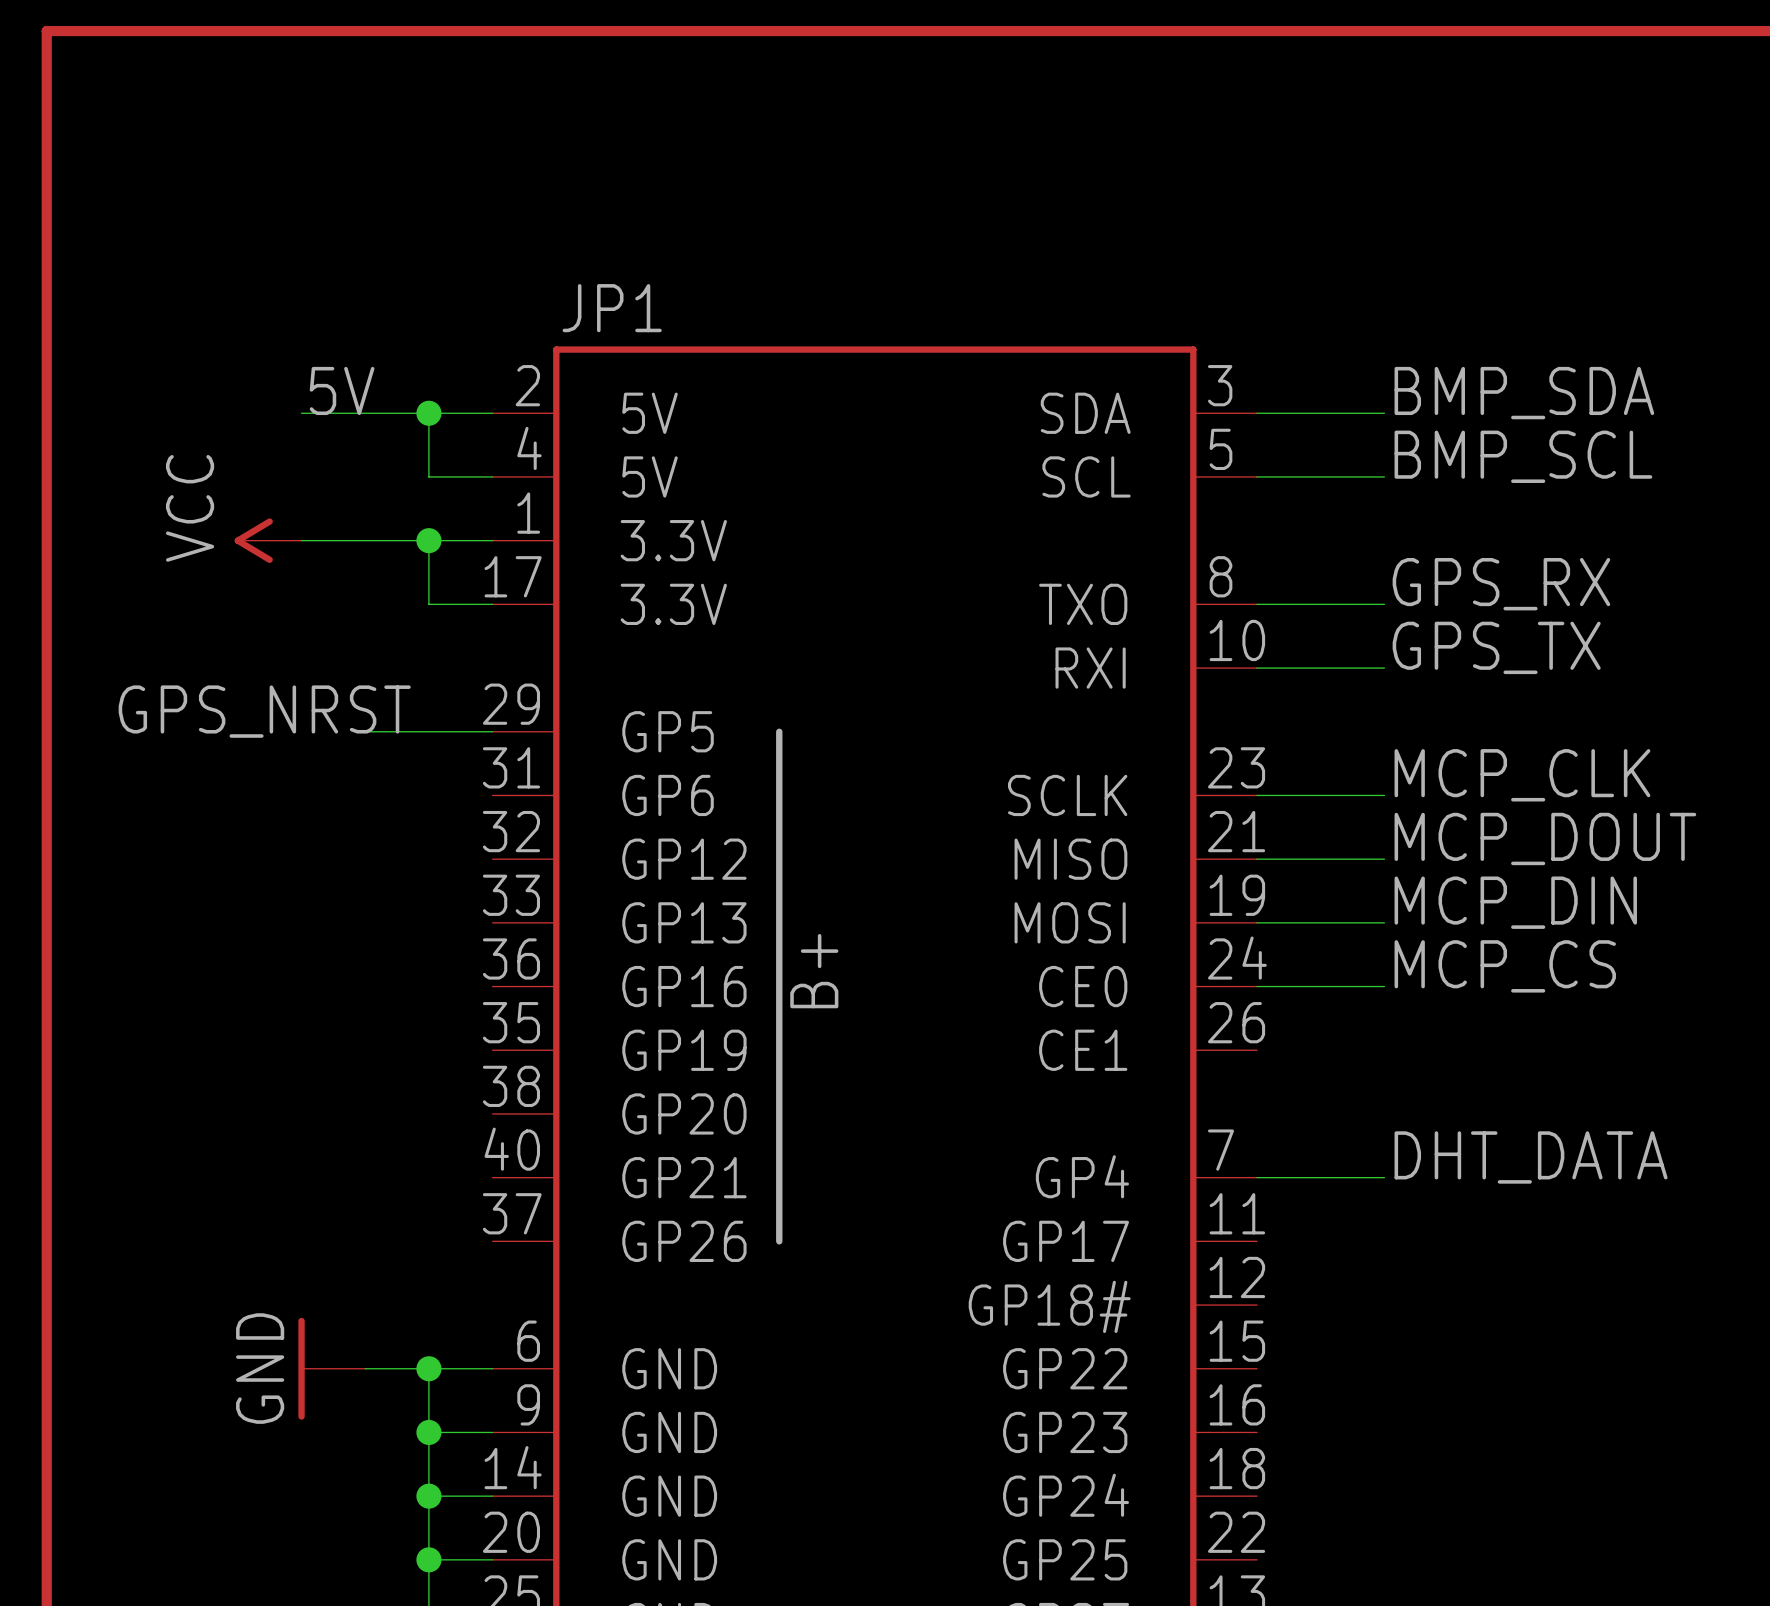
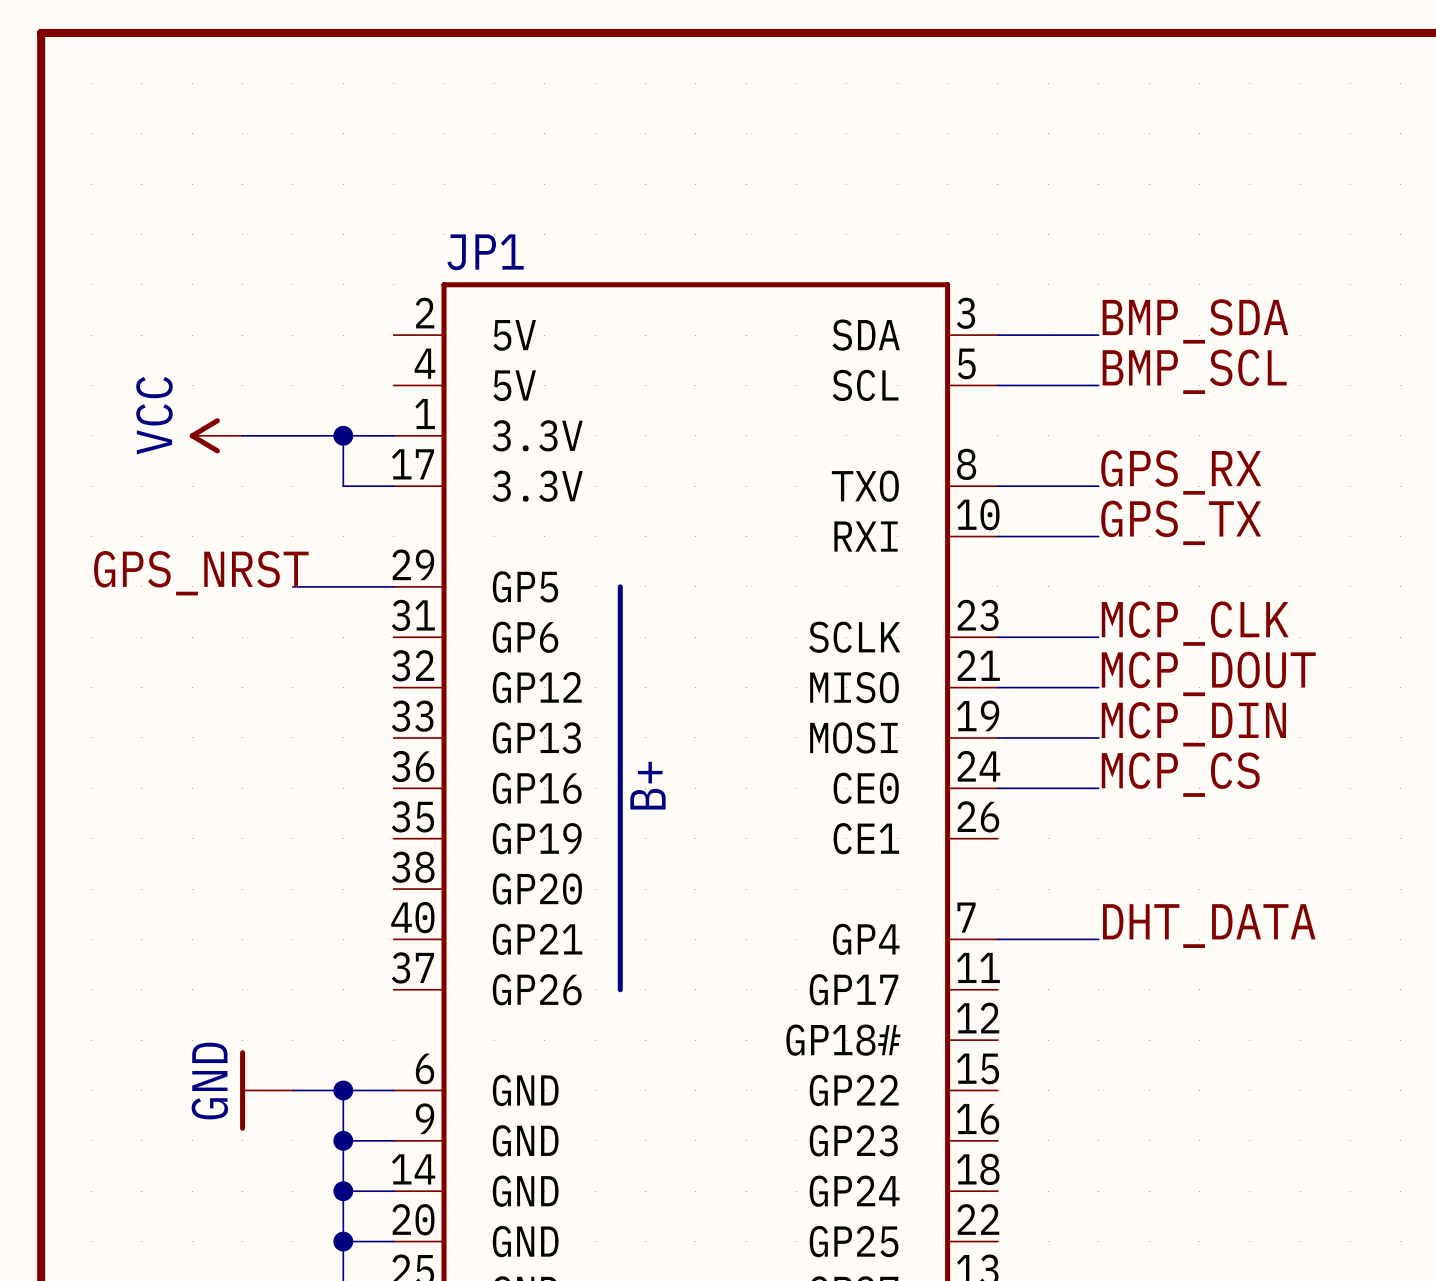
label: 5V (342, 390) -> none
wire: (301, 413) (492, 413) -> none
wire: (428, 413) (428, 476) (492, 476) -> none
junction: (428, 413) -> none

